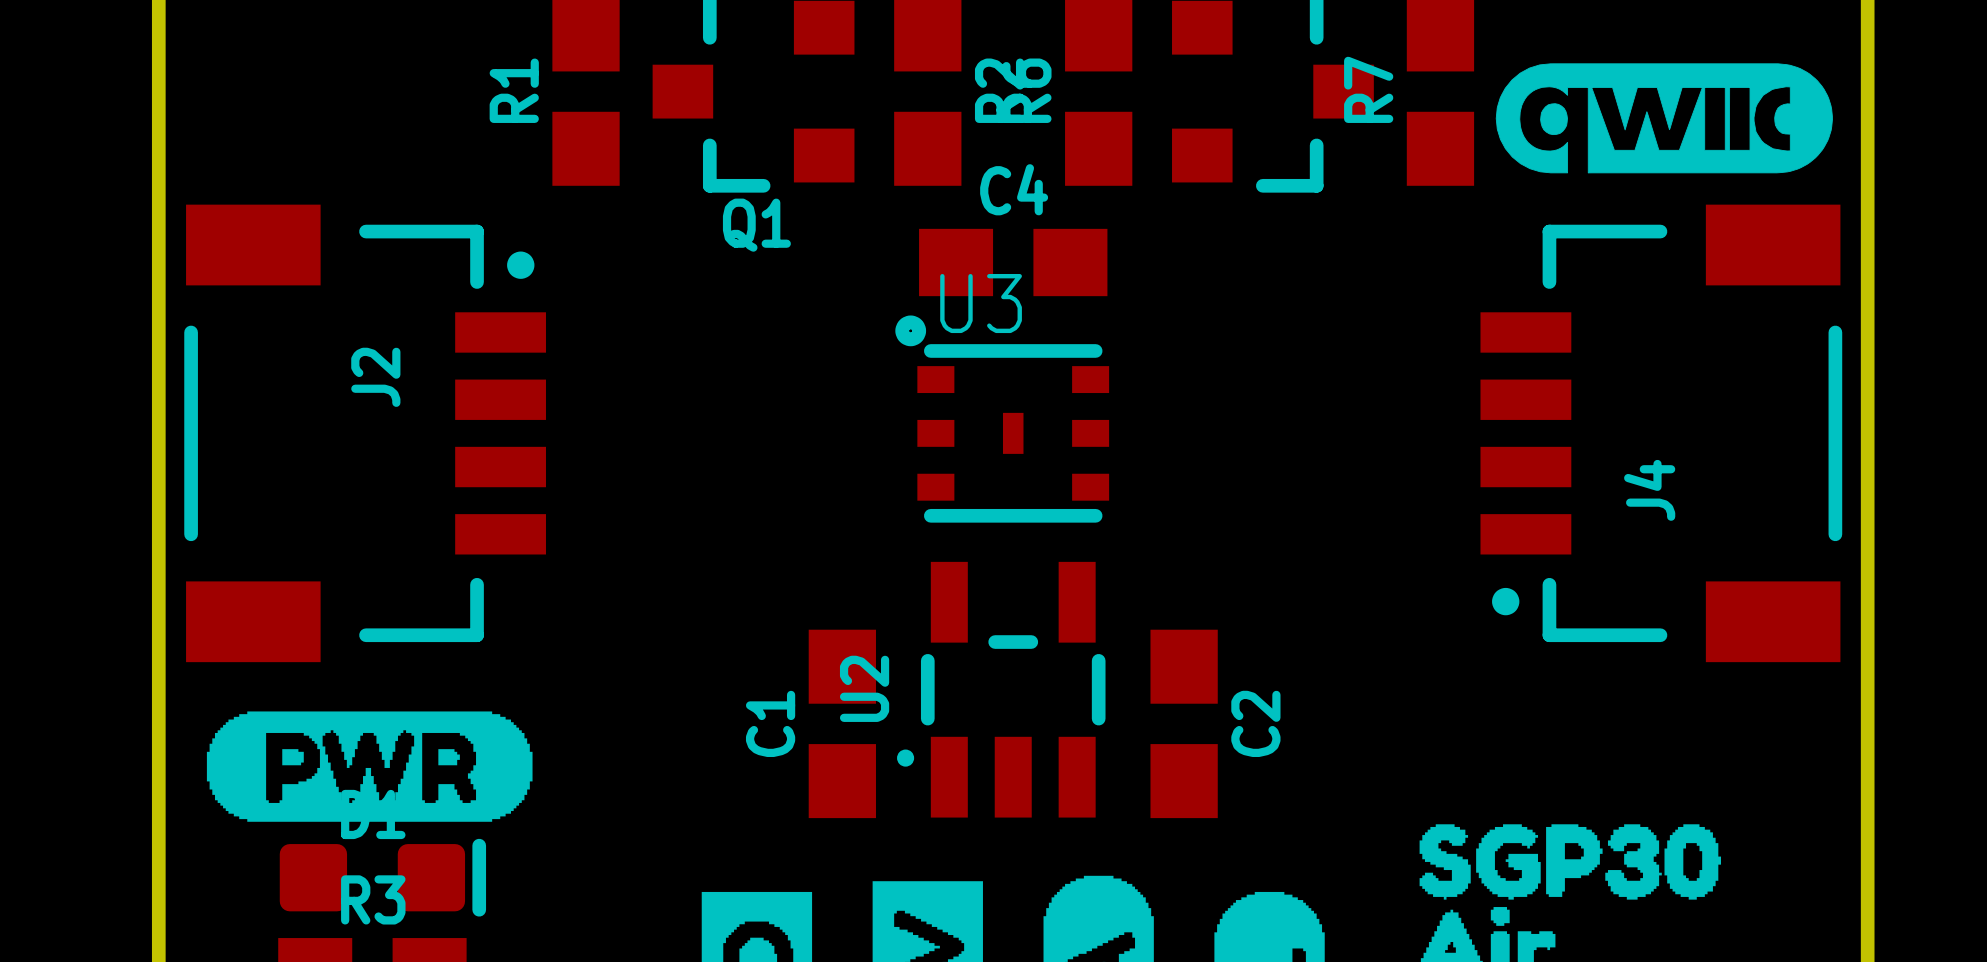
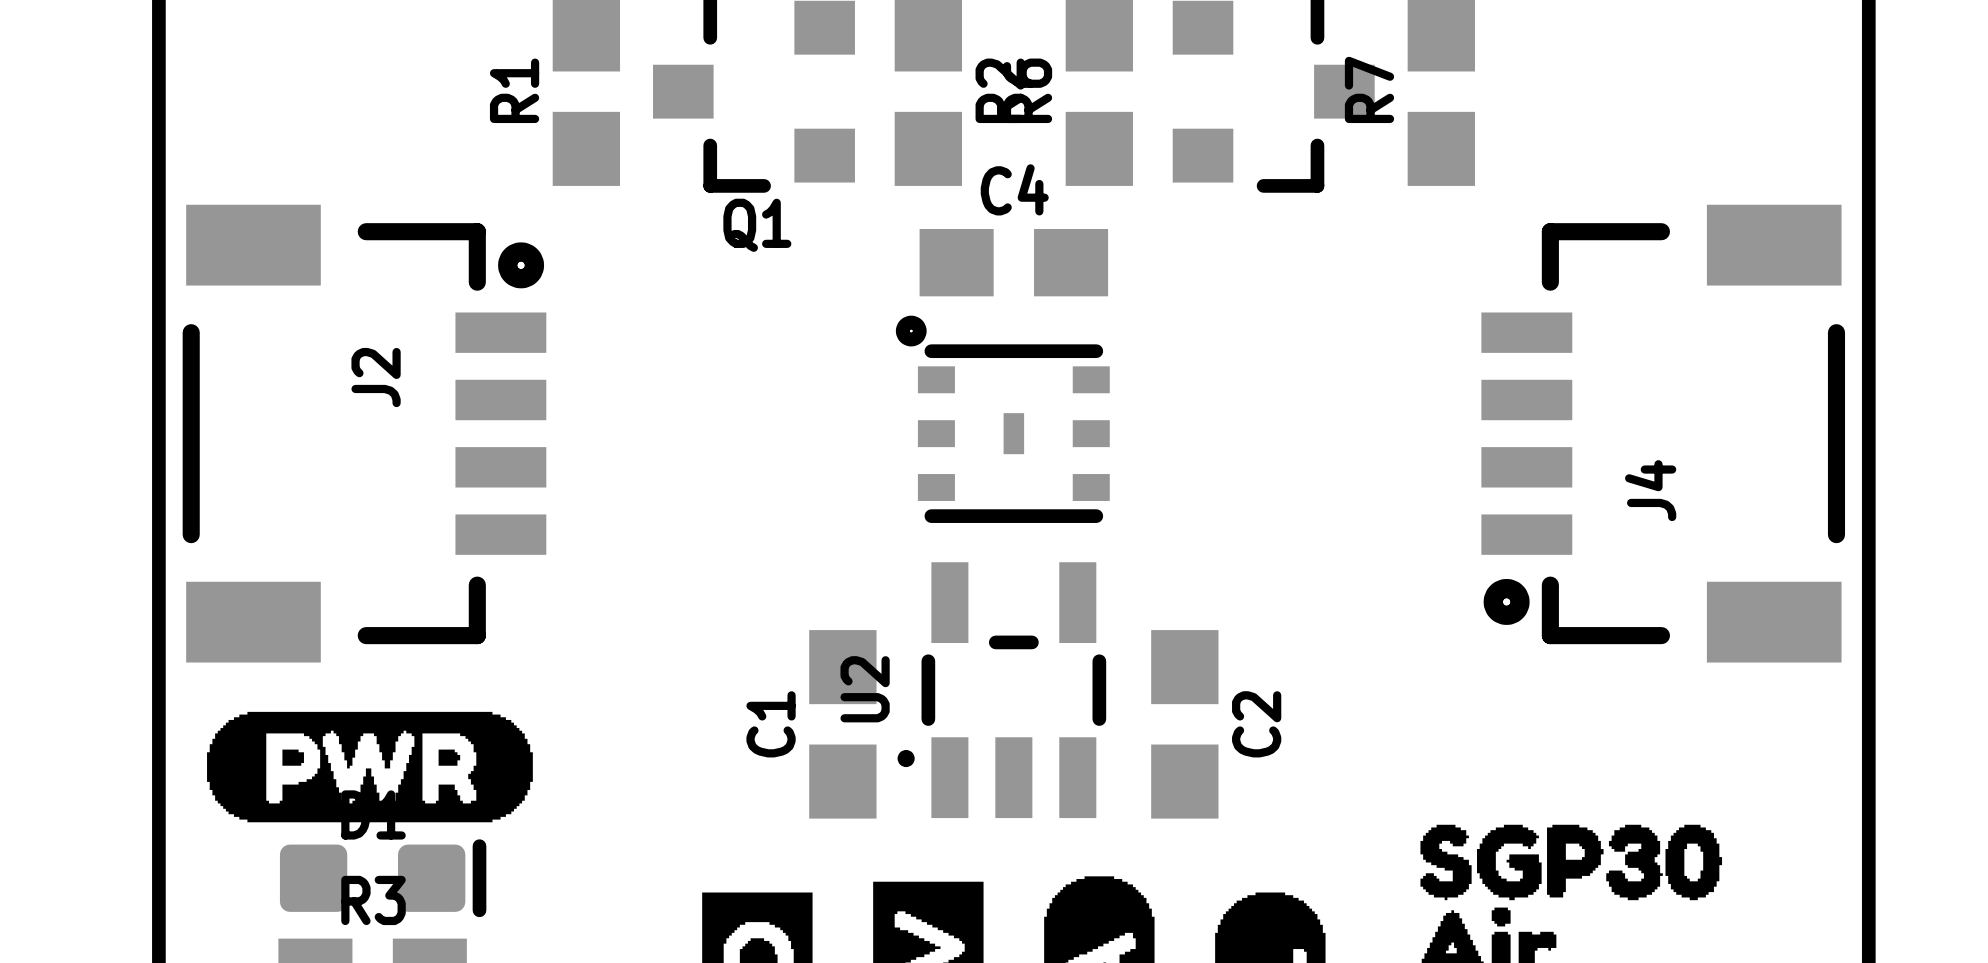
drawing: [1495, 63, 1833, 174] -> none
J2 footprint: [184, 204, 546, 663] -> [182, 204, 547, 663]
J4 footprint: [1480, 204, 1843, 663] -> [1481, 204, 1846, 663]
U3 name: U3 (981, 303) -> none

